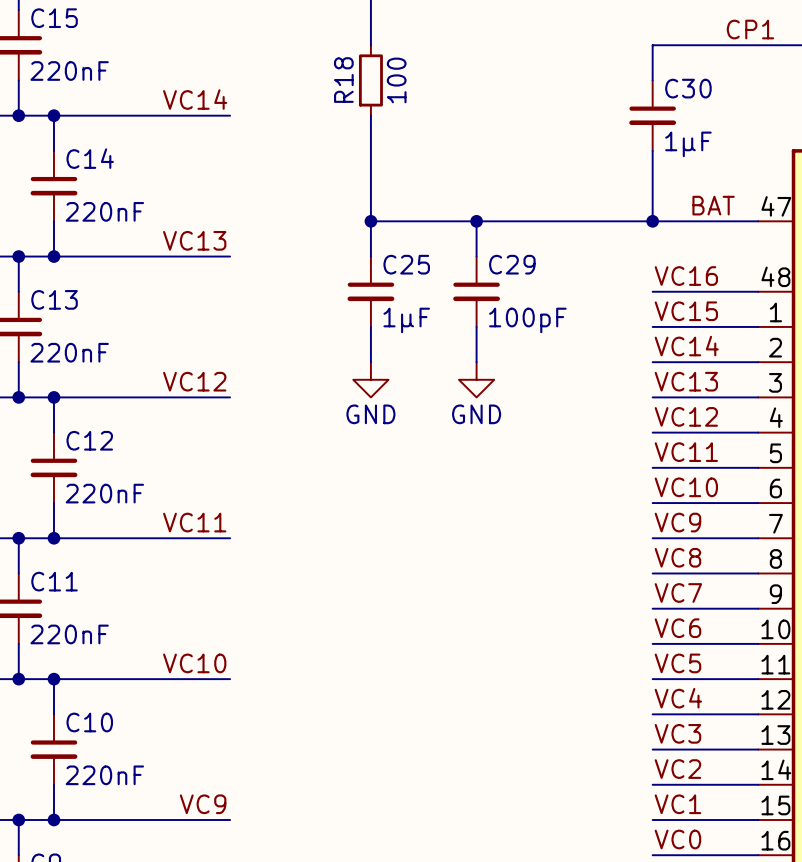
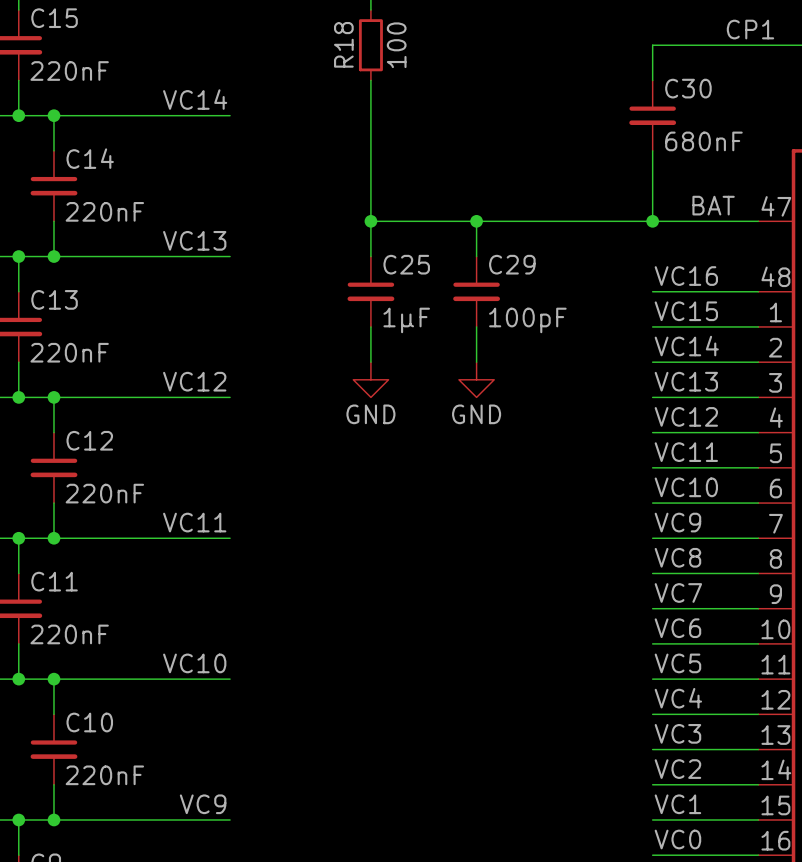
wire: (370, 10) (370, 45) -> (370, 80) (370, 115)
R18 position: (370, 80) -> (370, 45)
C30 value: 1µF (688, 144) -> 680nF (703, 141)

